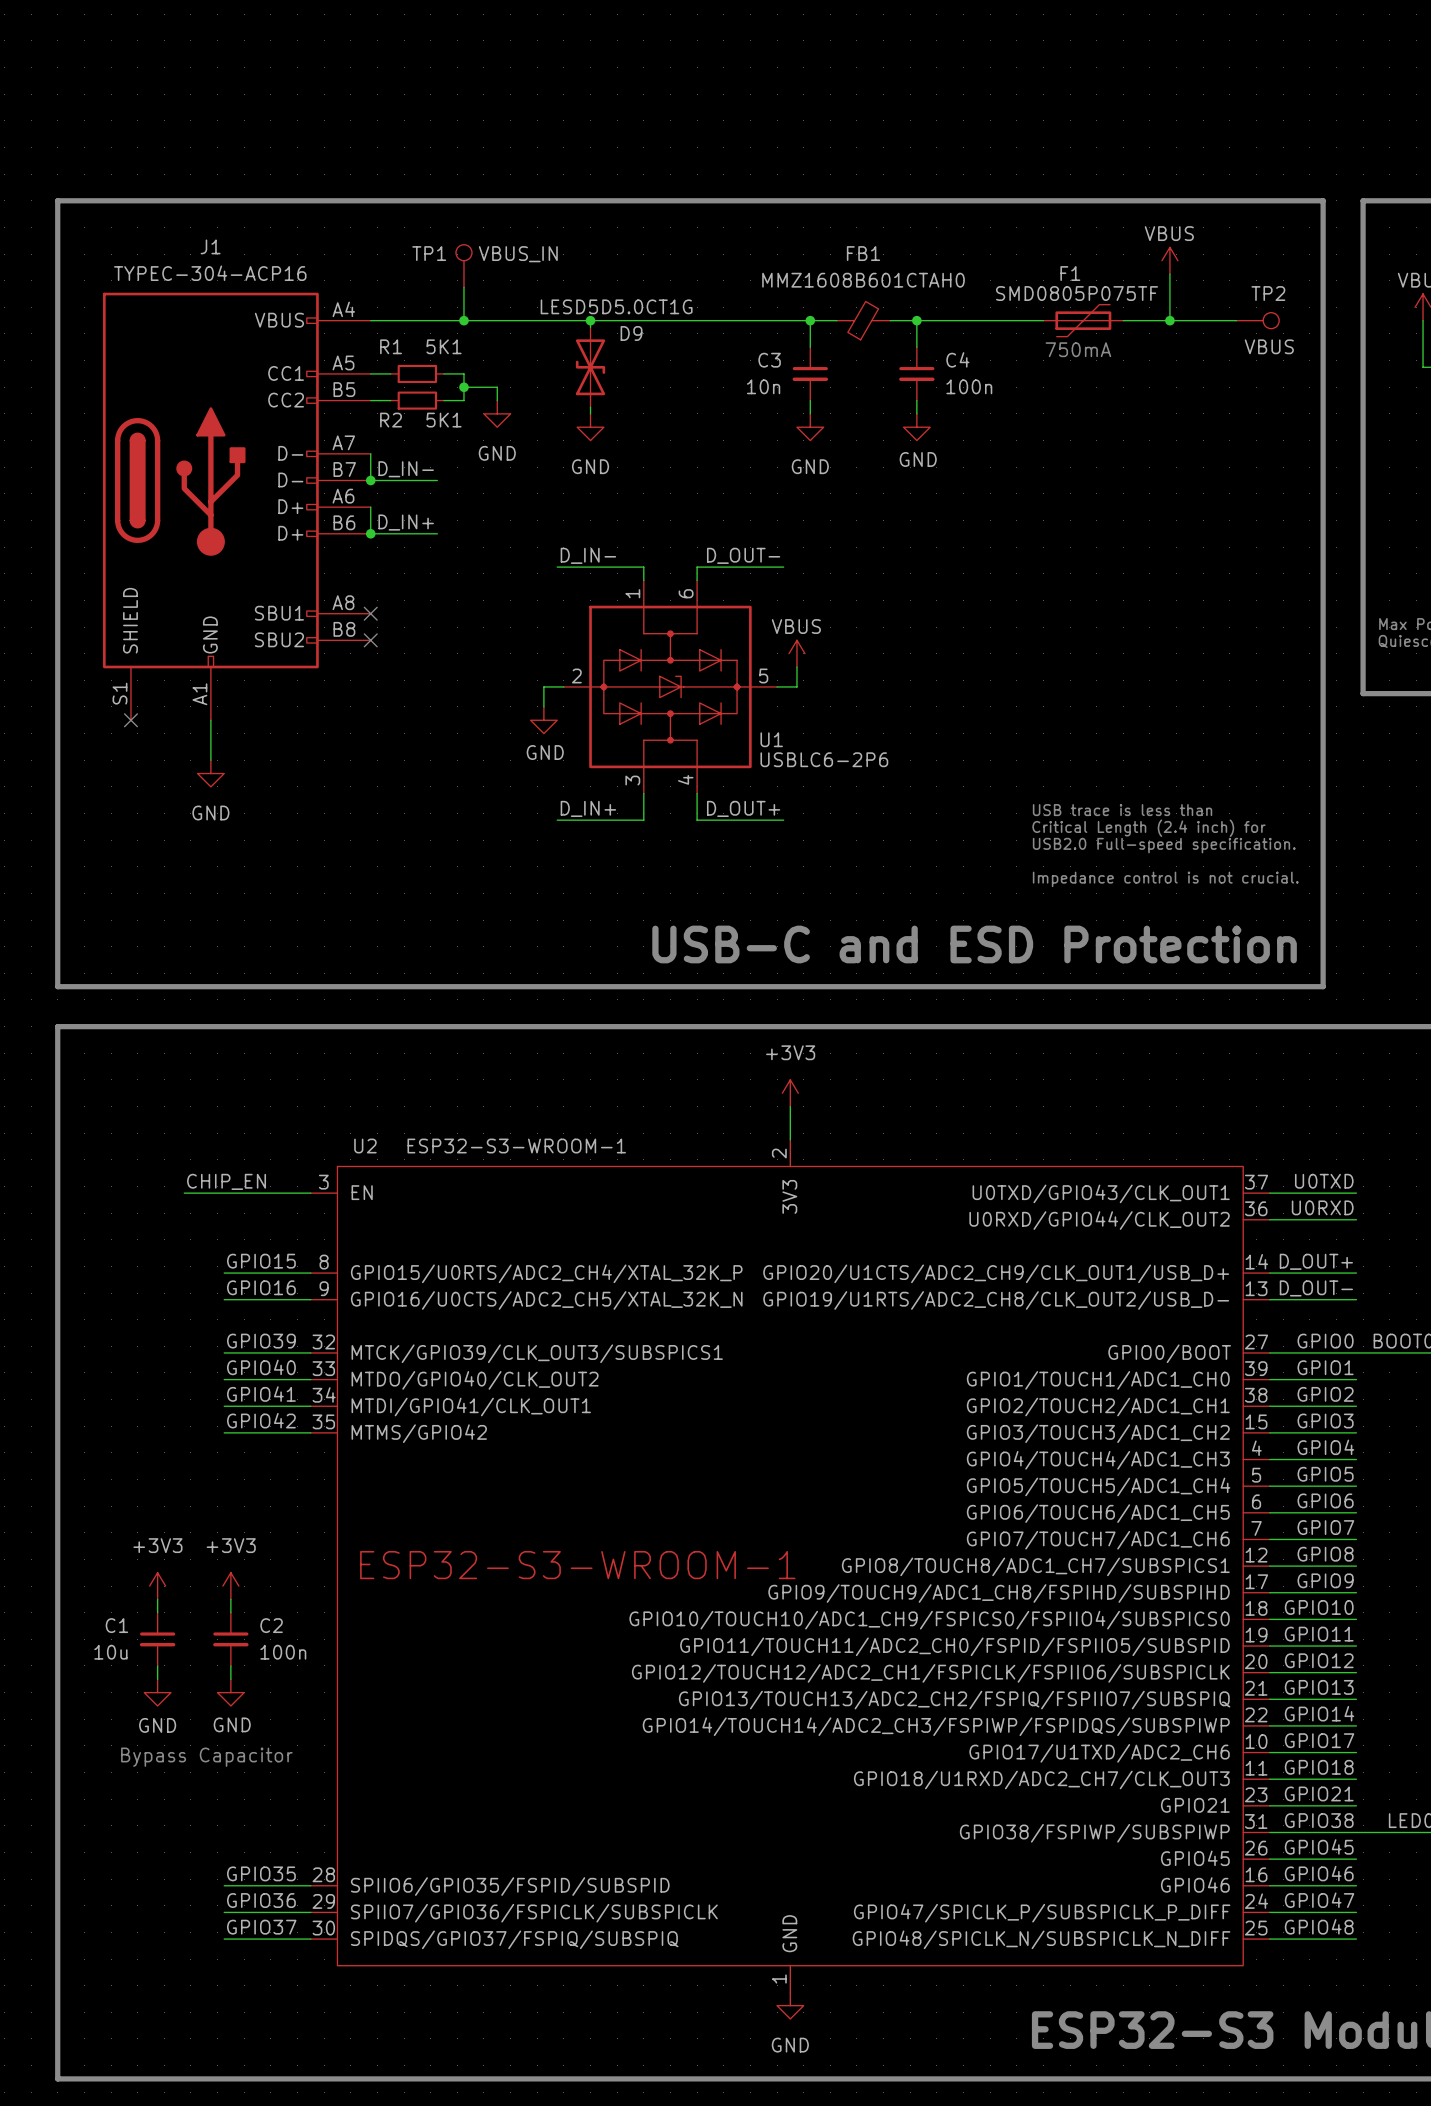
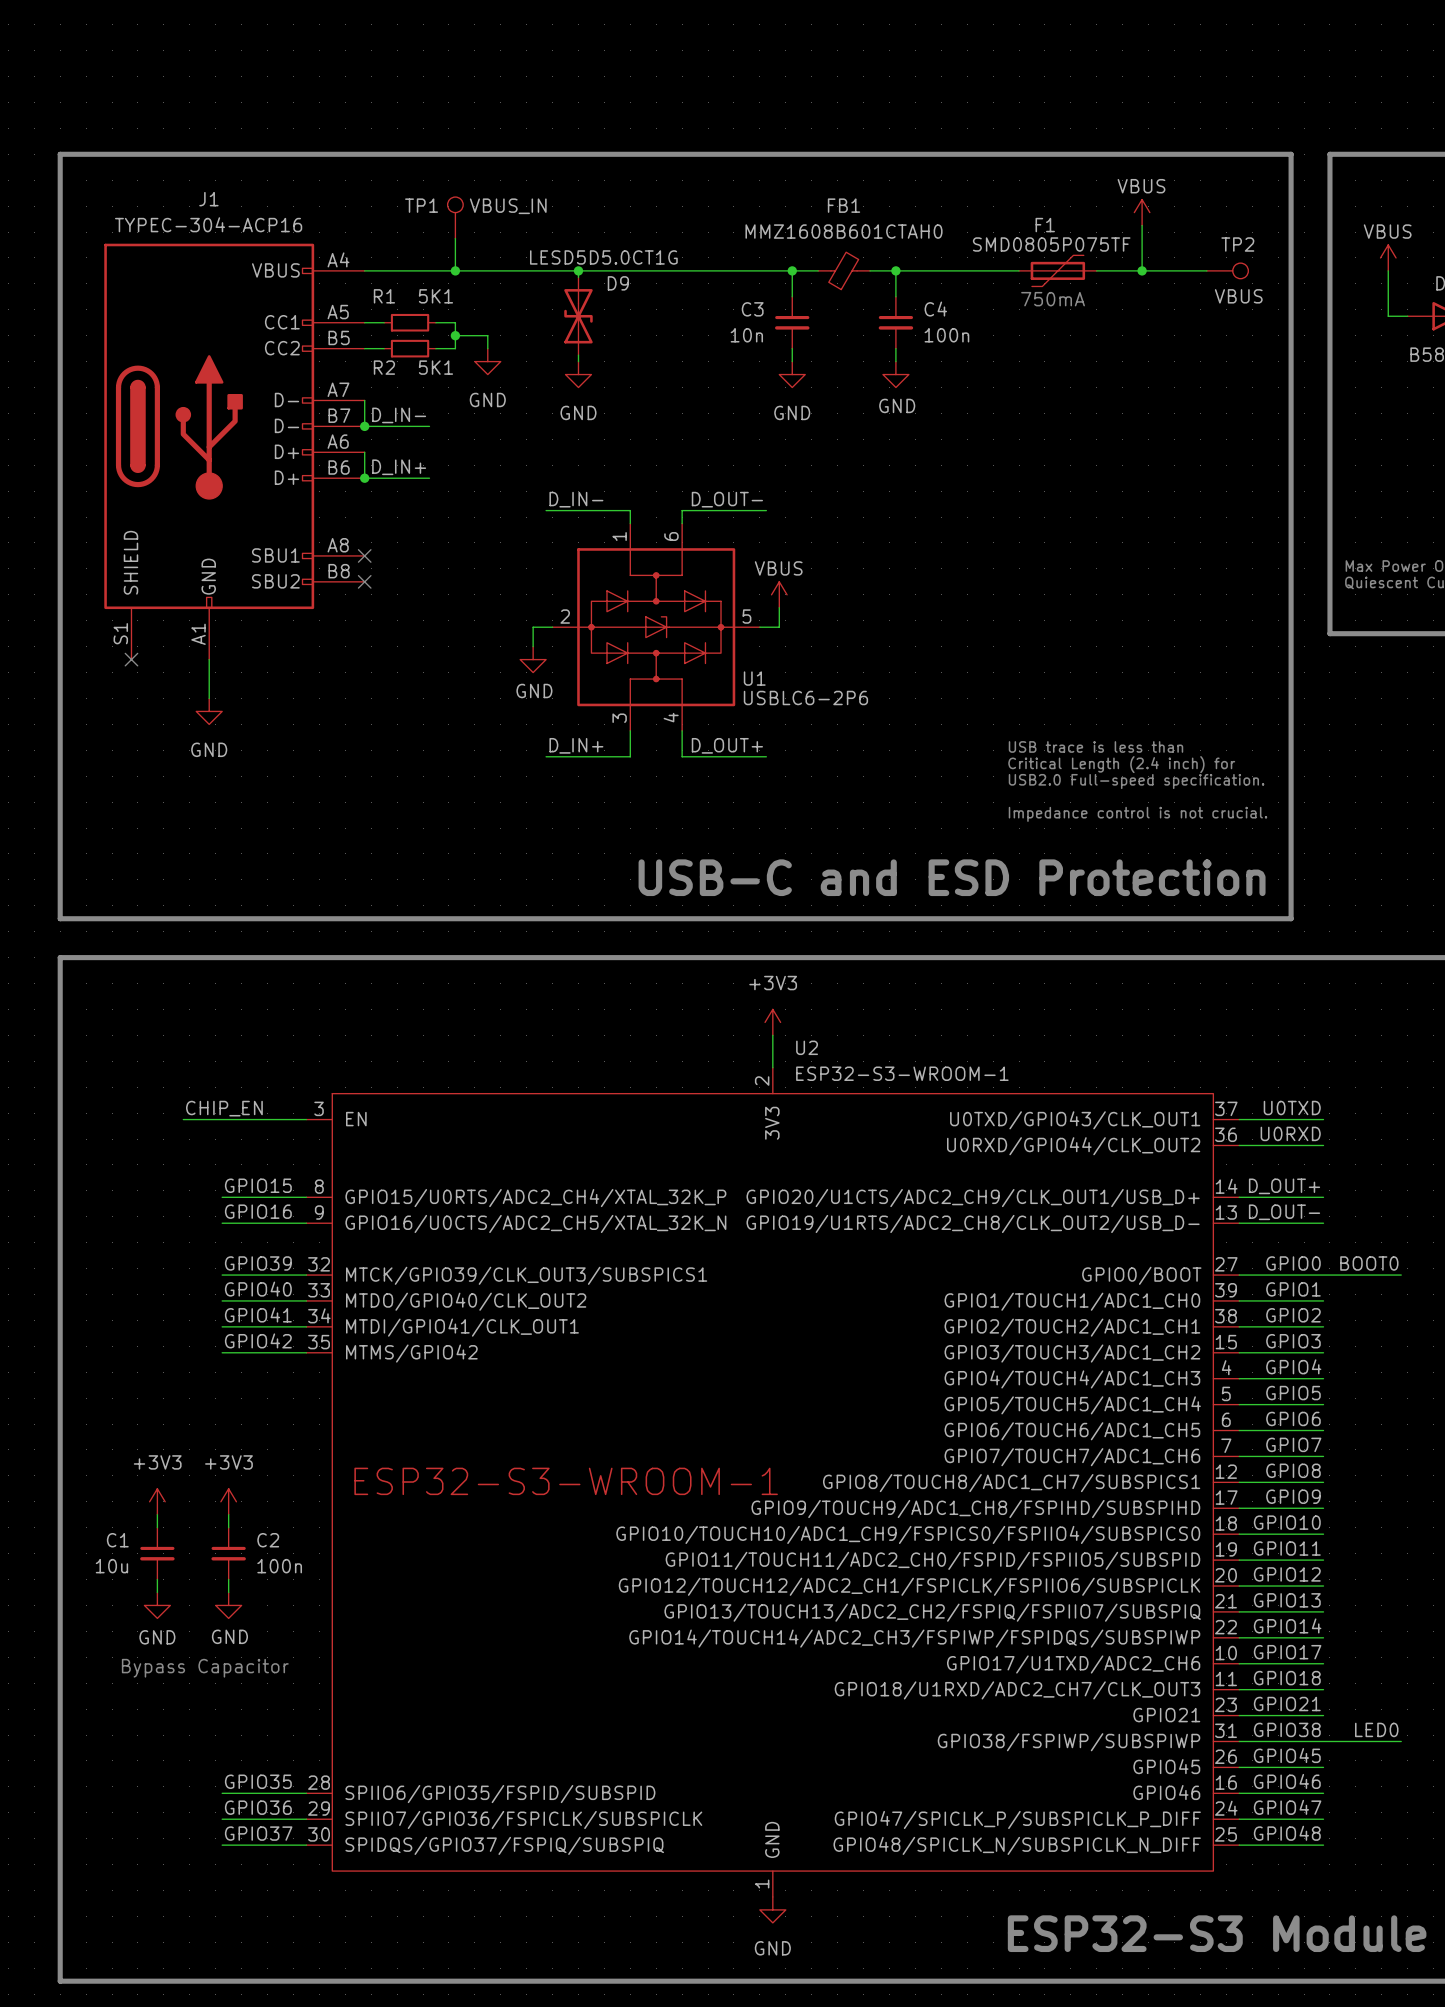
U2 name position: U2 (365, 1146) -> U2 (807, 1047)
U2 value position: ESP32-S3-WROOM-1 (516, 1146) -> ESP32-S3-WROOM-1 (902, 1073)

